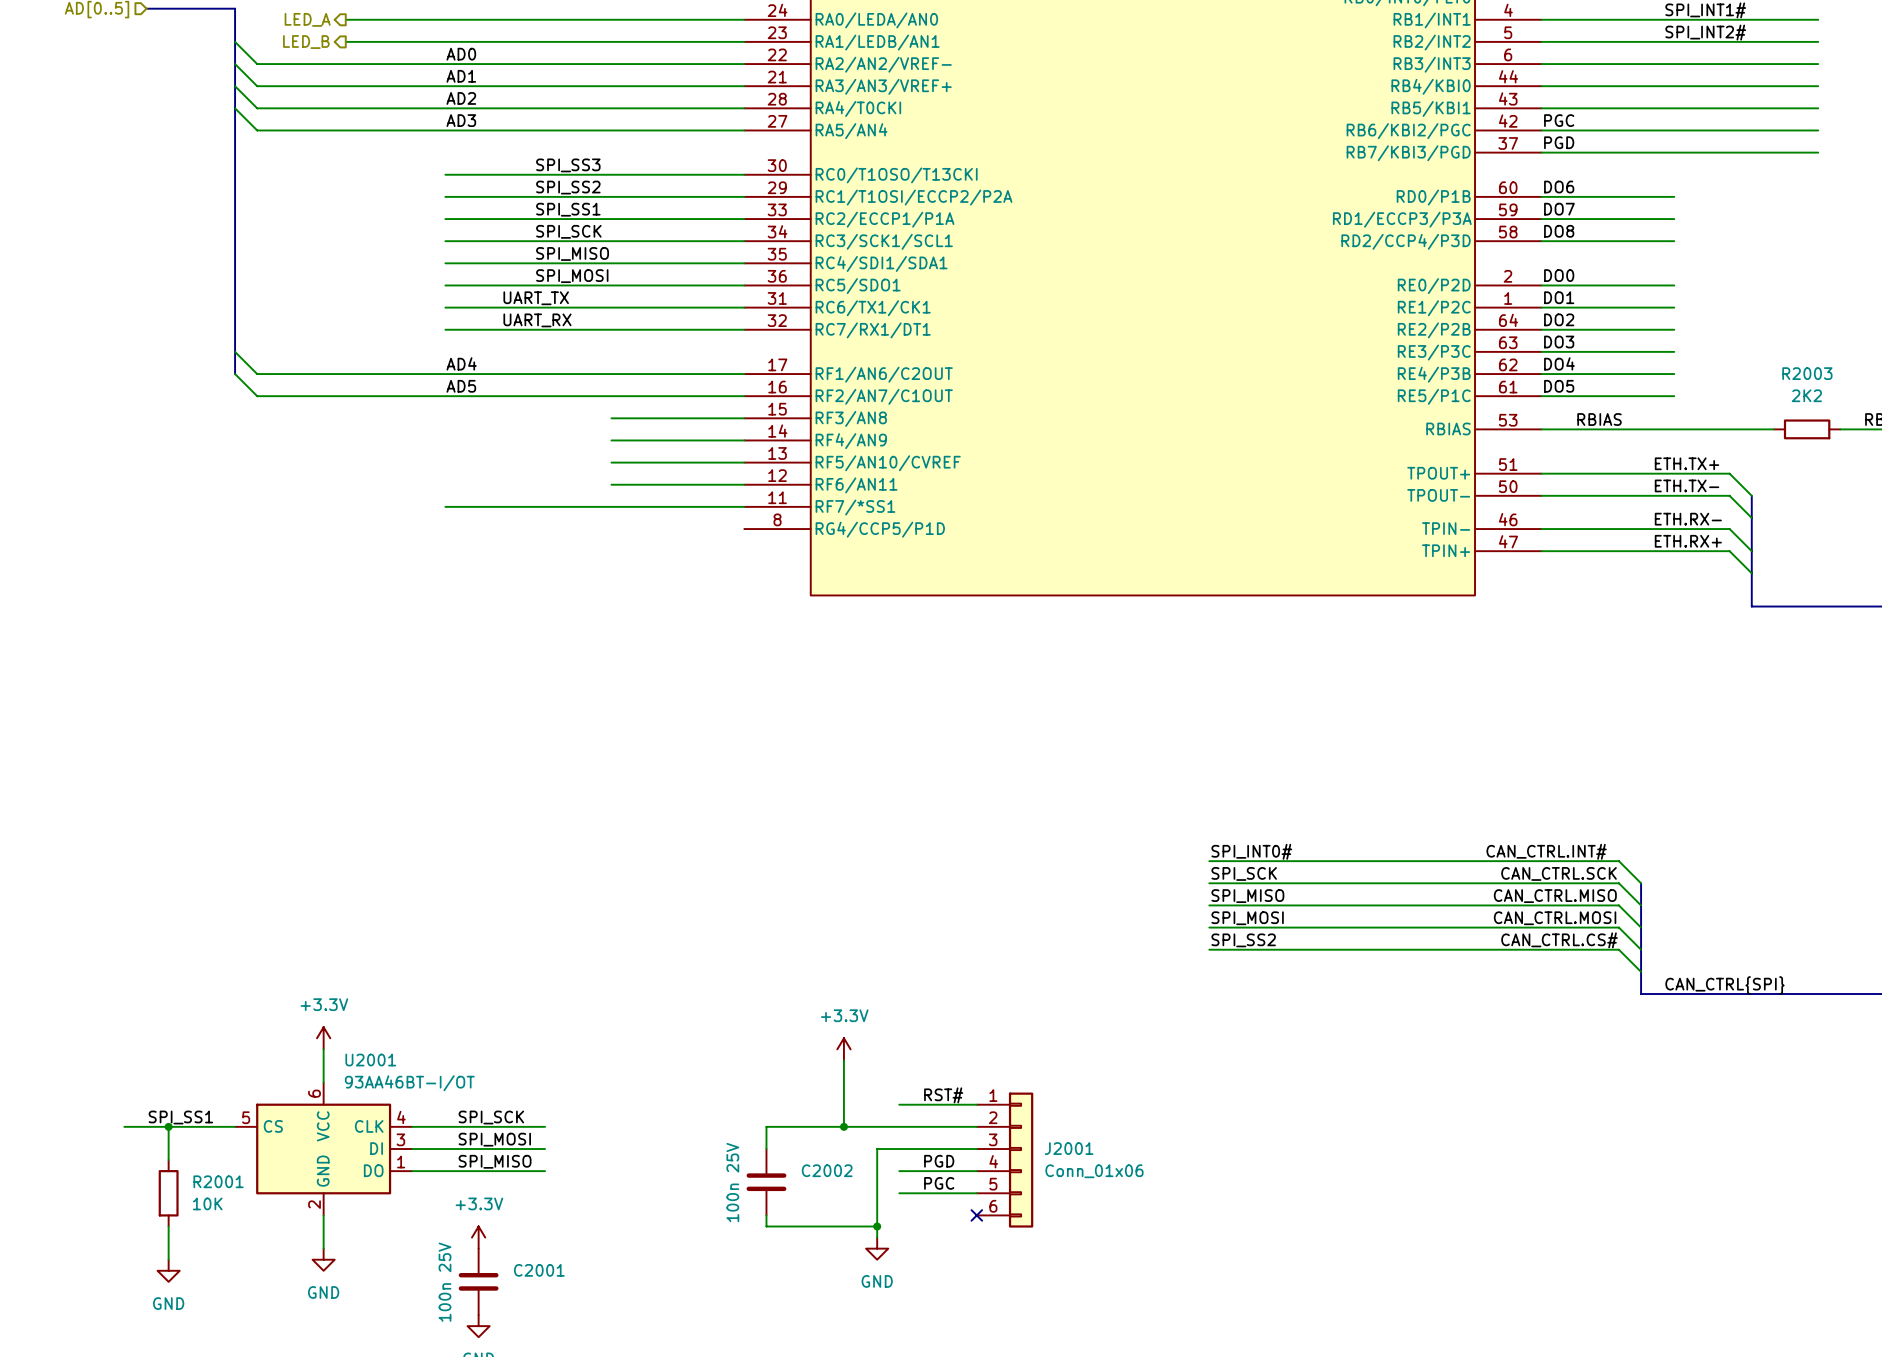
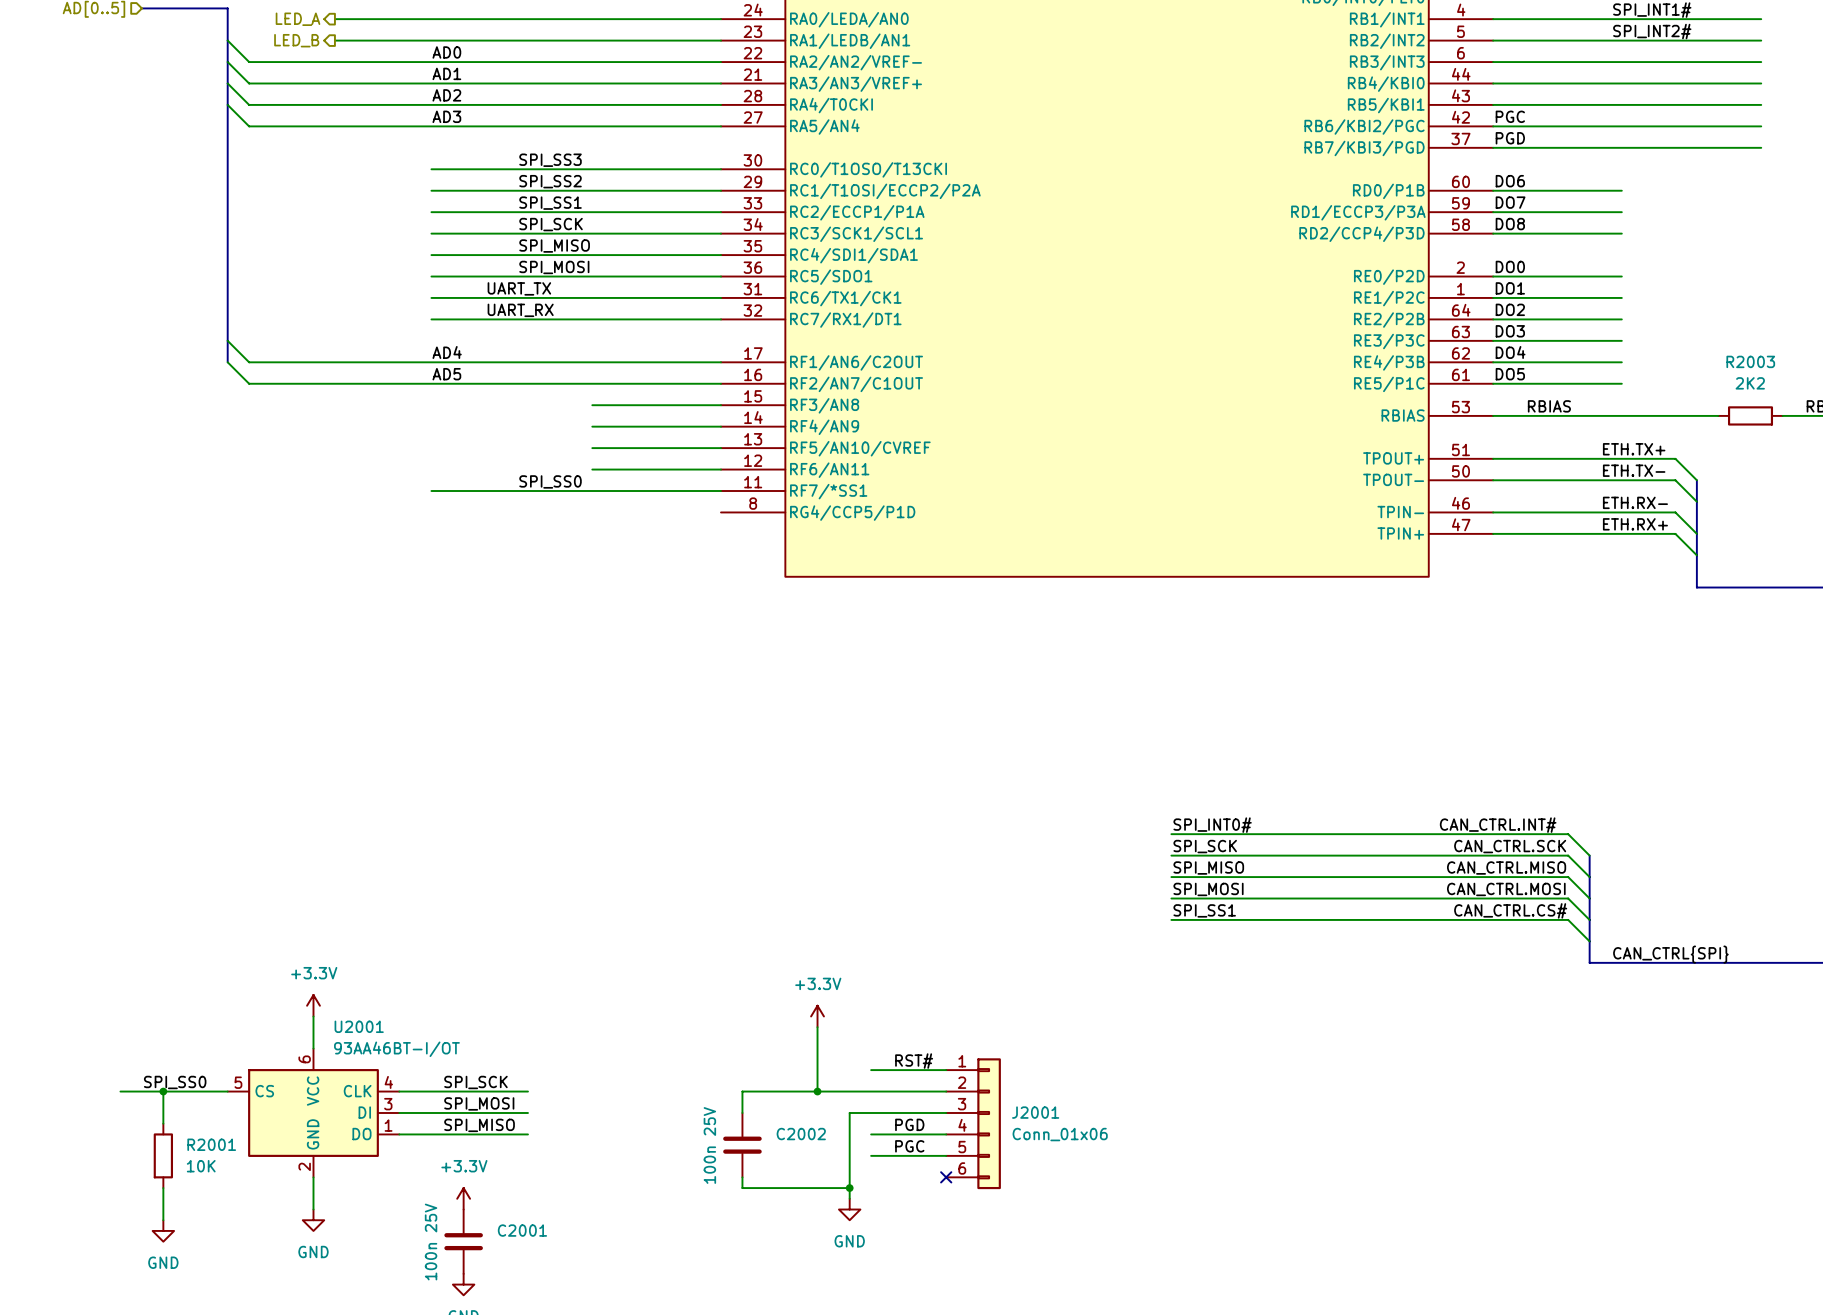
label: none -> SPI_SS0 (550, 481)
label: SPI_SS2 (1243, 940) -> SPI_SS1 (1204, 910)
label: SPI_SS1 (180, 1117) -> SPI_SS0 (175, 1082)

